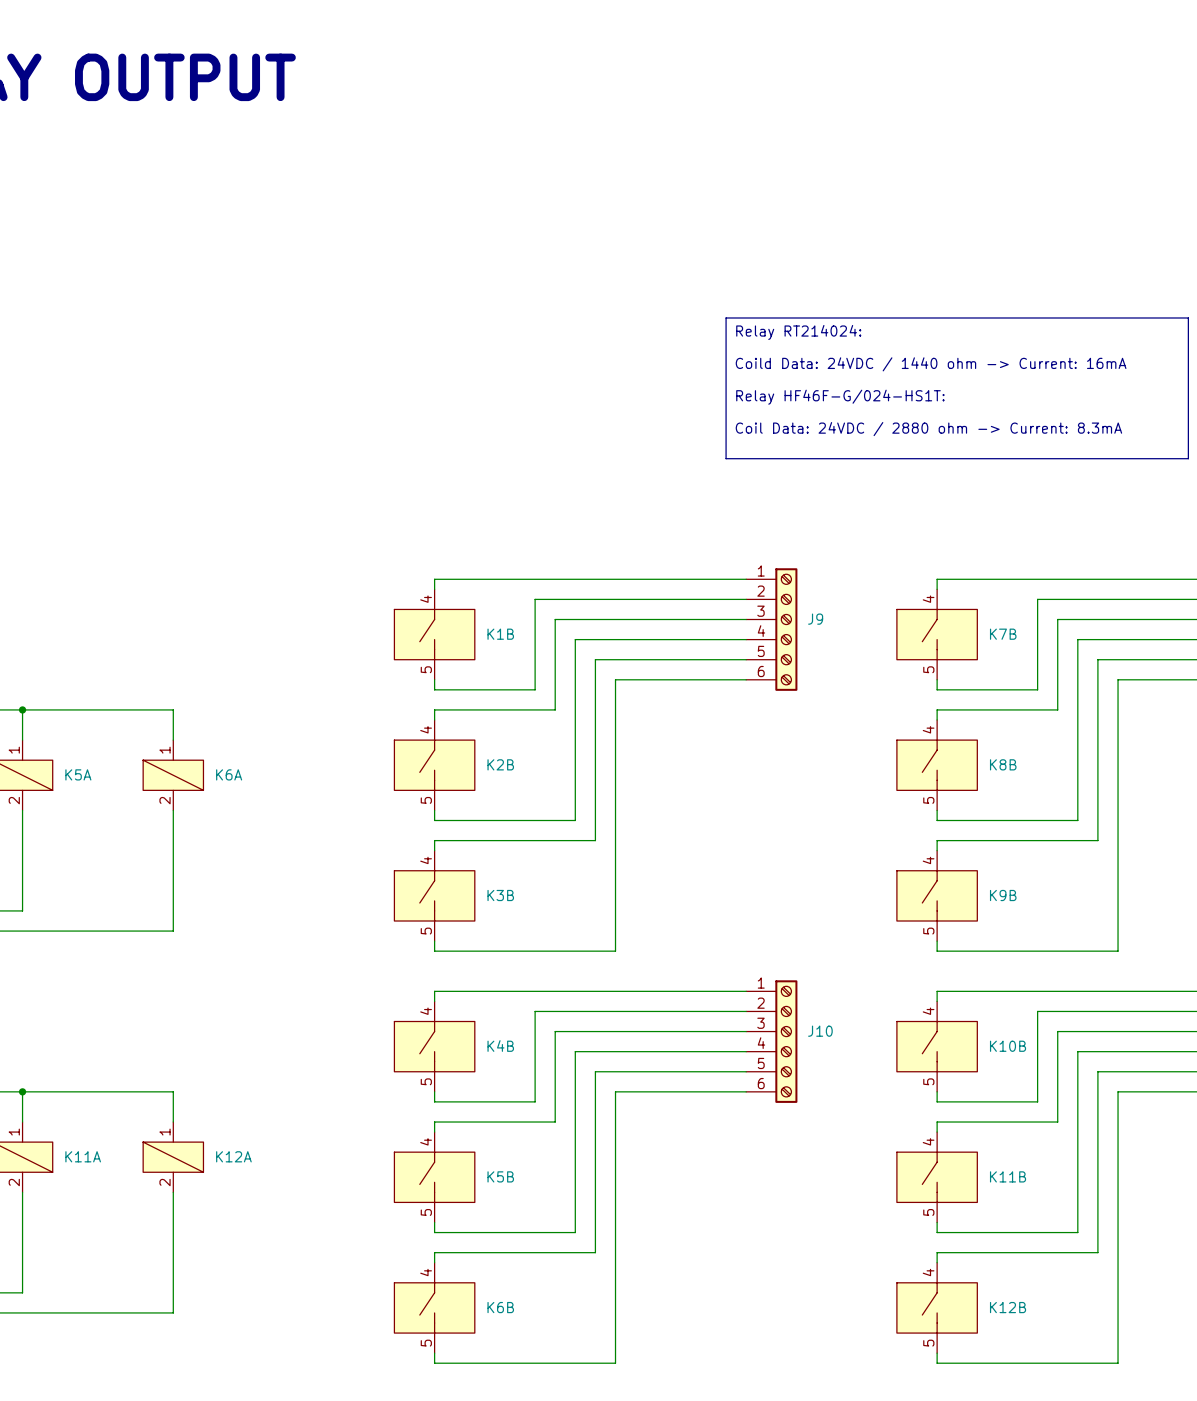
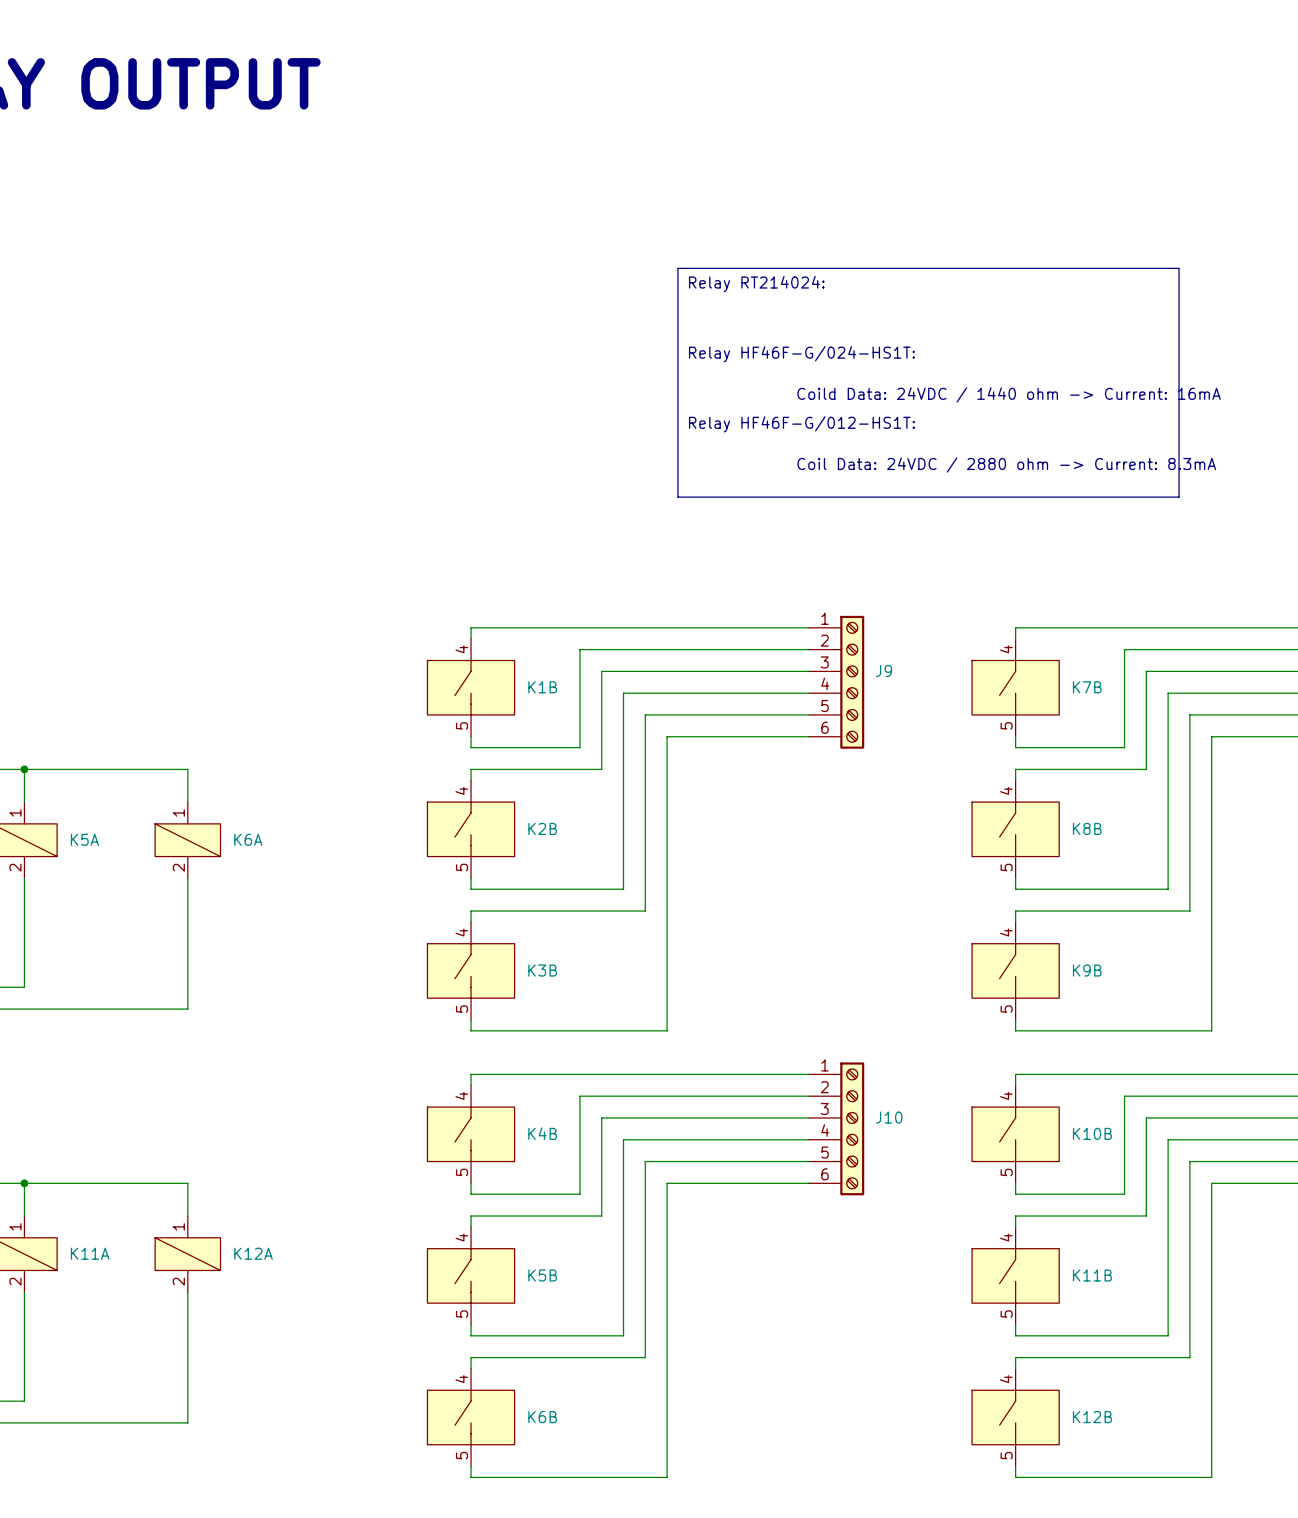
text position: Relay RT214024: (798, 332) -> Relay RT214024: (756, 284)
text: none -> Relay HF46F-G/012-HS1T: (801, 424)
text position: Relay HF46F-G/024-HS1T: (840, 397) -> Relay HF46F-G/024-HS1T: (801, 354)
line: (726, 458) (726, 317) (1188, 317) (1188, 458) (1087, 458) -> (786, 497) (677, 497) (677, 268) (1179, 268) (1179, 497)

